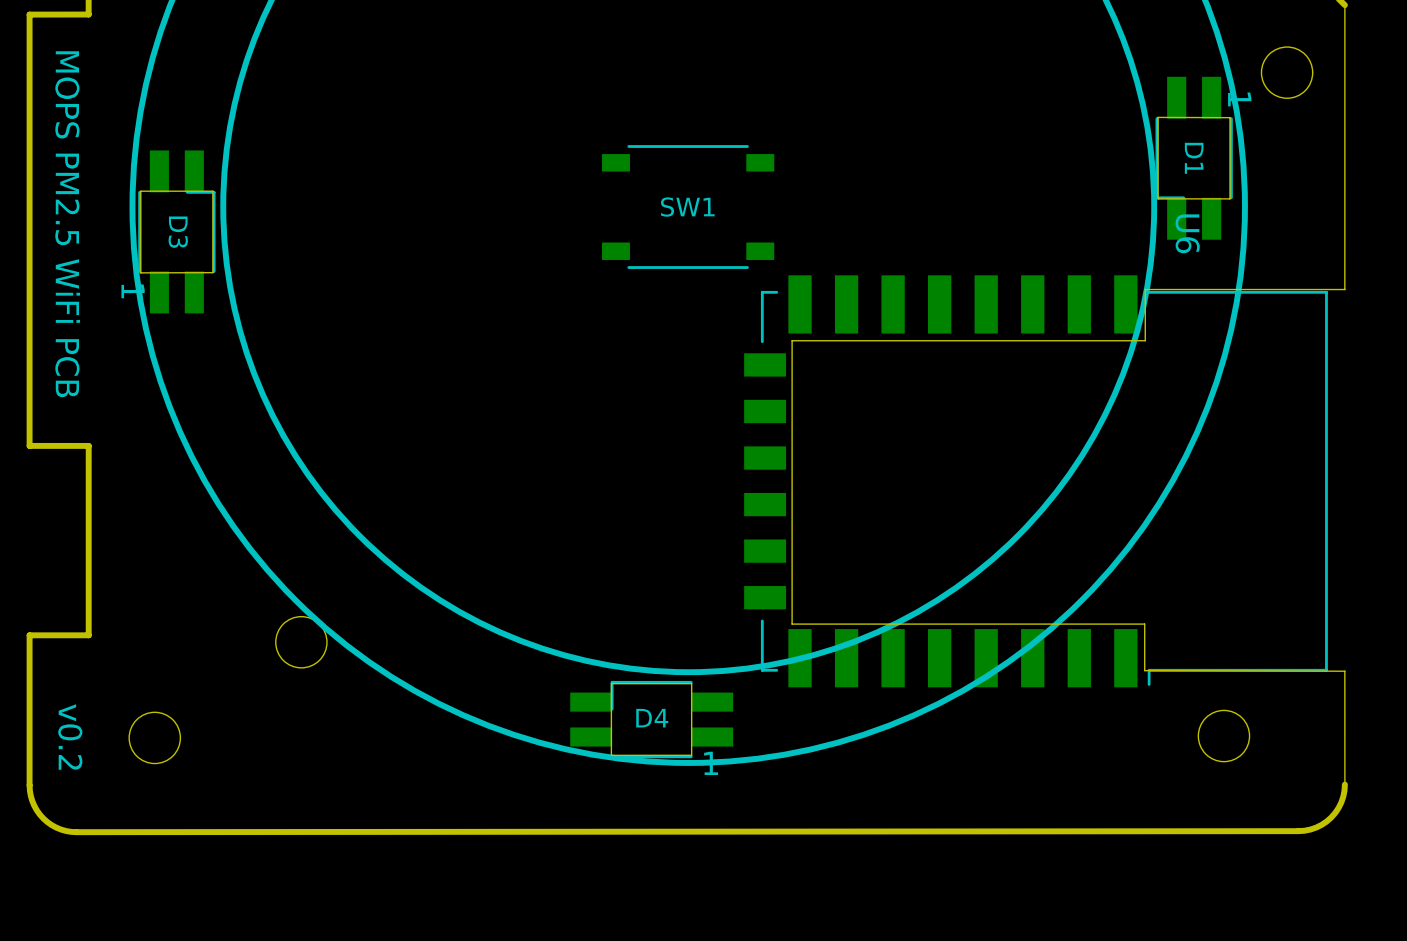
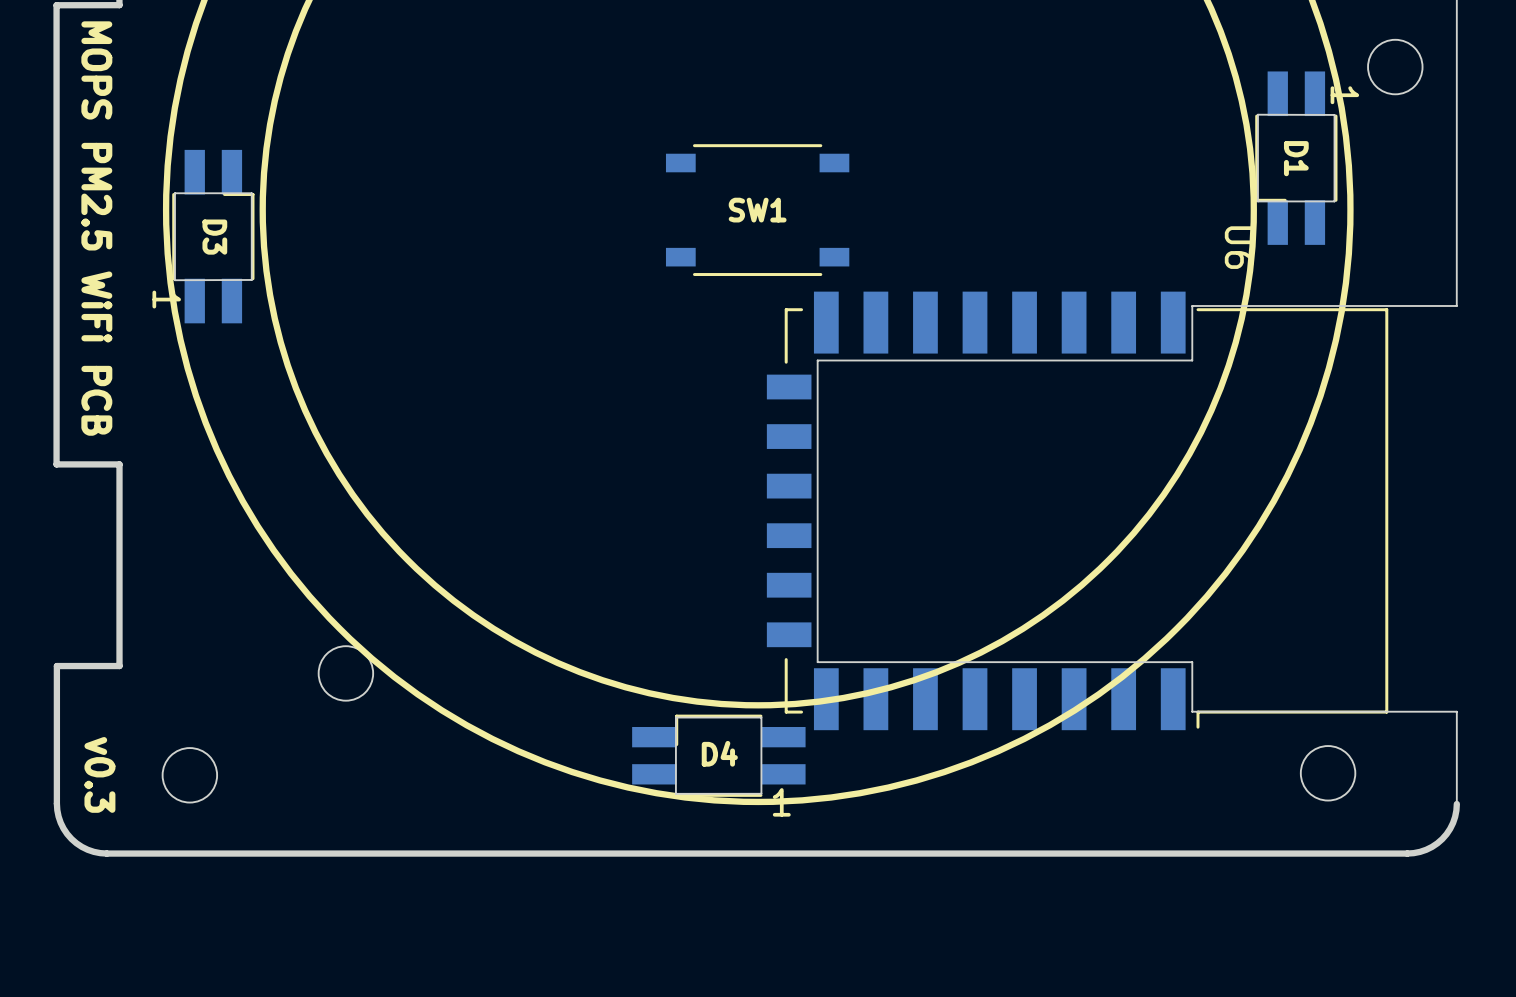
board edge: (1344, 289) (1145, 289) (1145, 340) (792, 340) (792, 624) (1144, 624) (1144, 670) (1344, 671) (1343, 796) (1338, 807) (1331, 817) (1321, 824) (1310, 829) (1298, 831) (71, 831) (56, 827) (47, 822) (36, 810) (30, 795) (29, 635) -> (1456, 297) (1456, 305) (1192, 305) (1192, 360) (817, 360) (817, 662) (1192, 662) (1192, 711) (1456, 711) (1455, 816) (1450, 828) (1442, 839) (1432, 846) (1420, 851) (1407, 853) (100, 853) (87, 849) (71, 838) (63, 828) (58, 816) (56, 803) (56, 666)
U6 position: (1036, 481) -> (1077, 510)
text: v0.2 (70, 737) -> v0.3 (99, 774)

